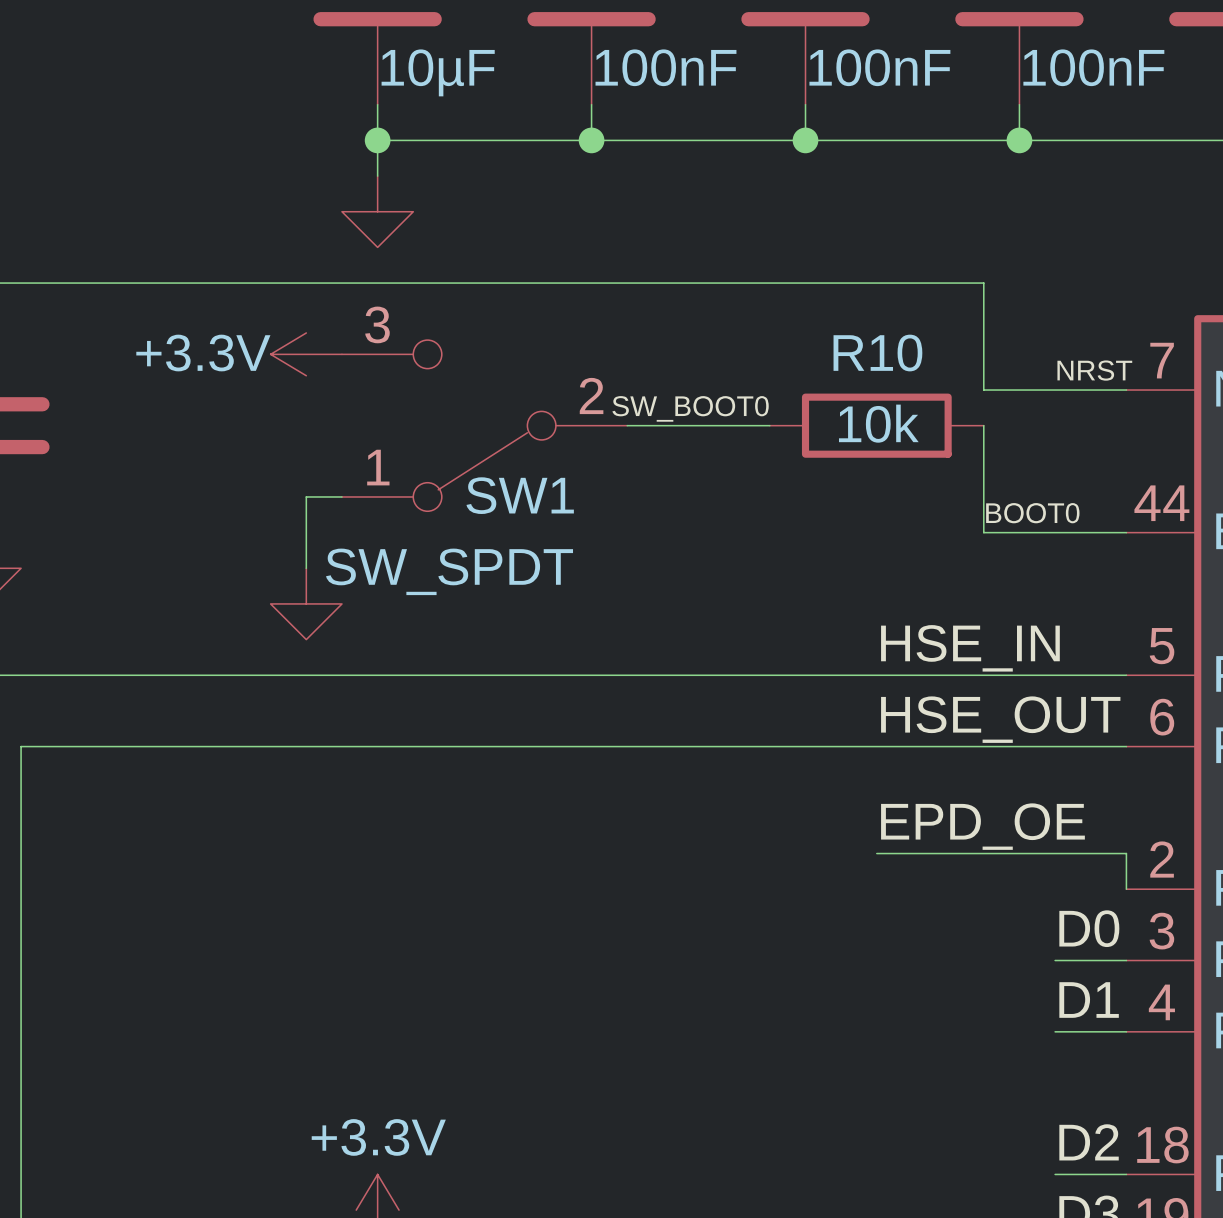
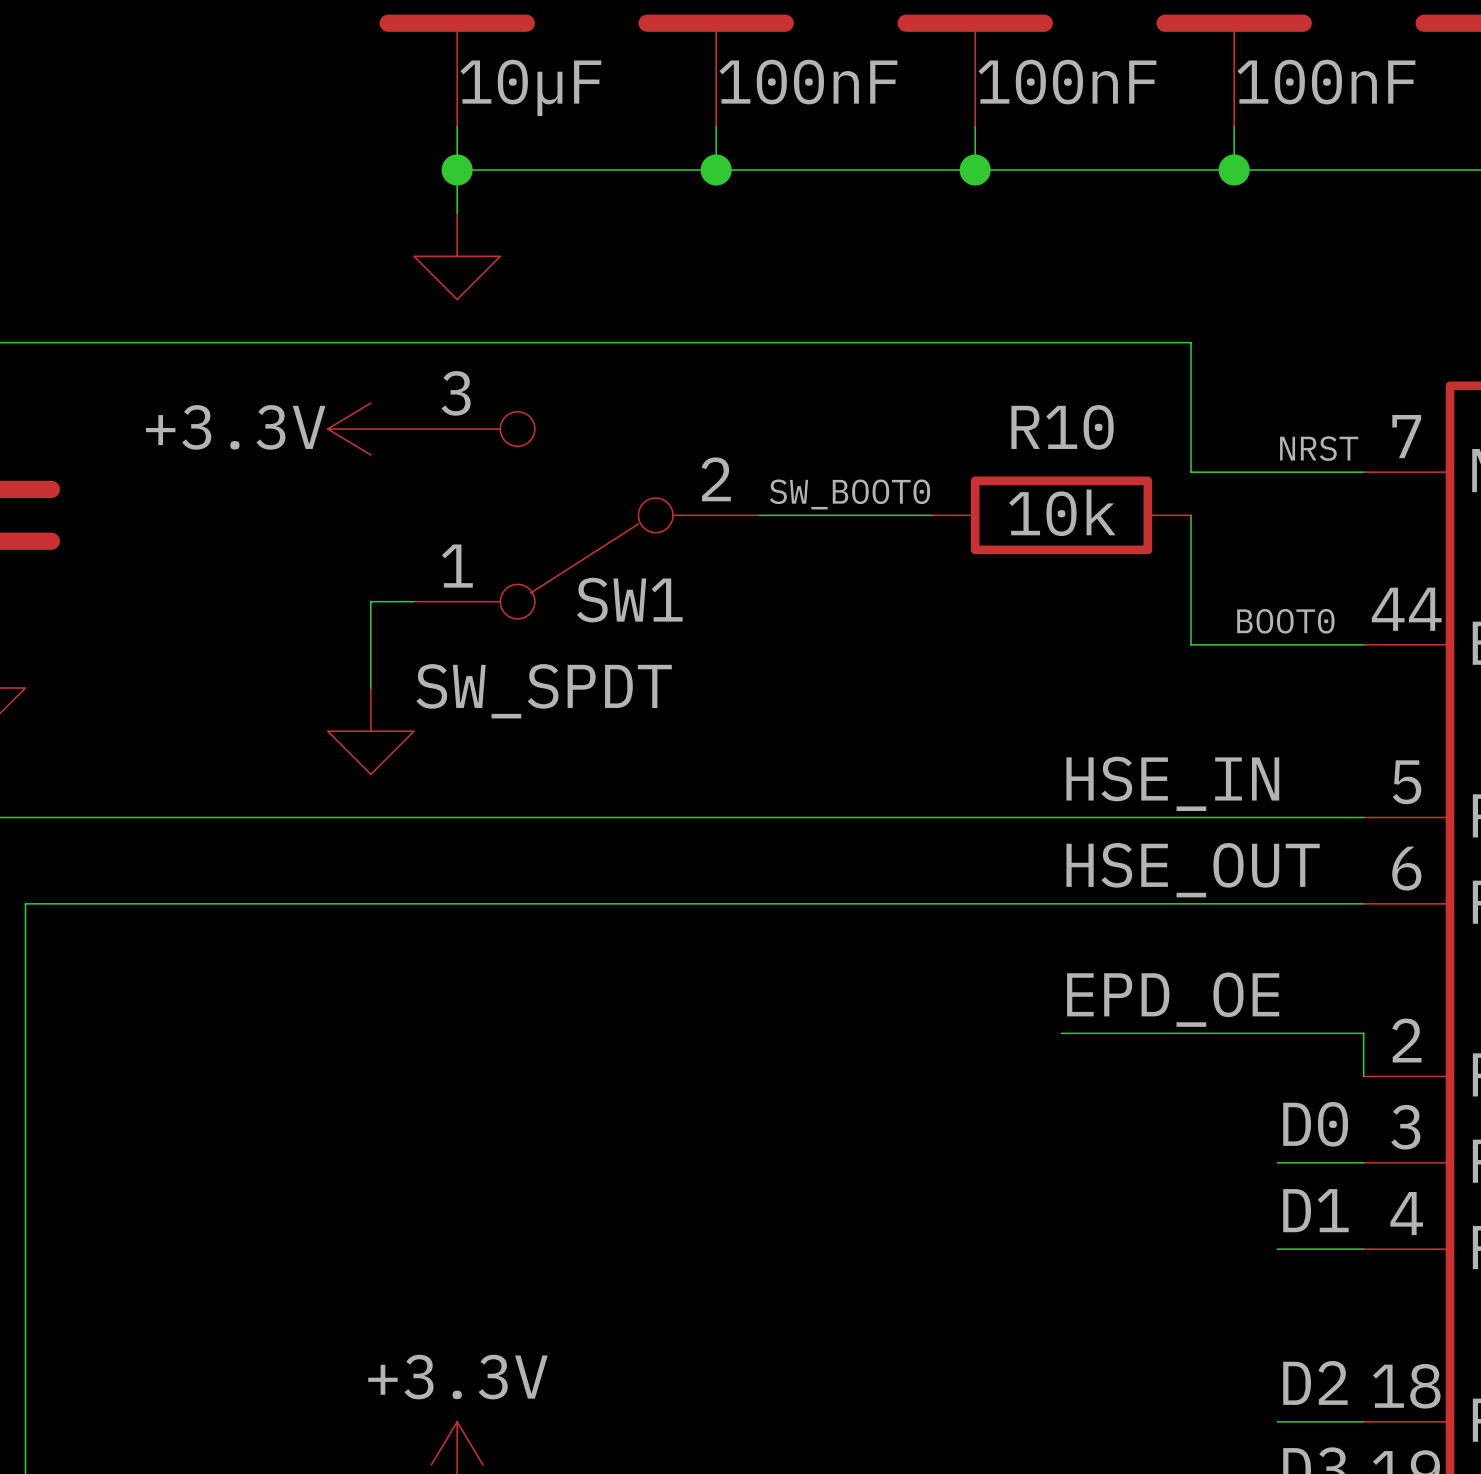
label position: BOOT0 (1032, 513) -> BOOT0 (1285, 621)

